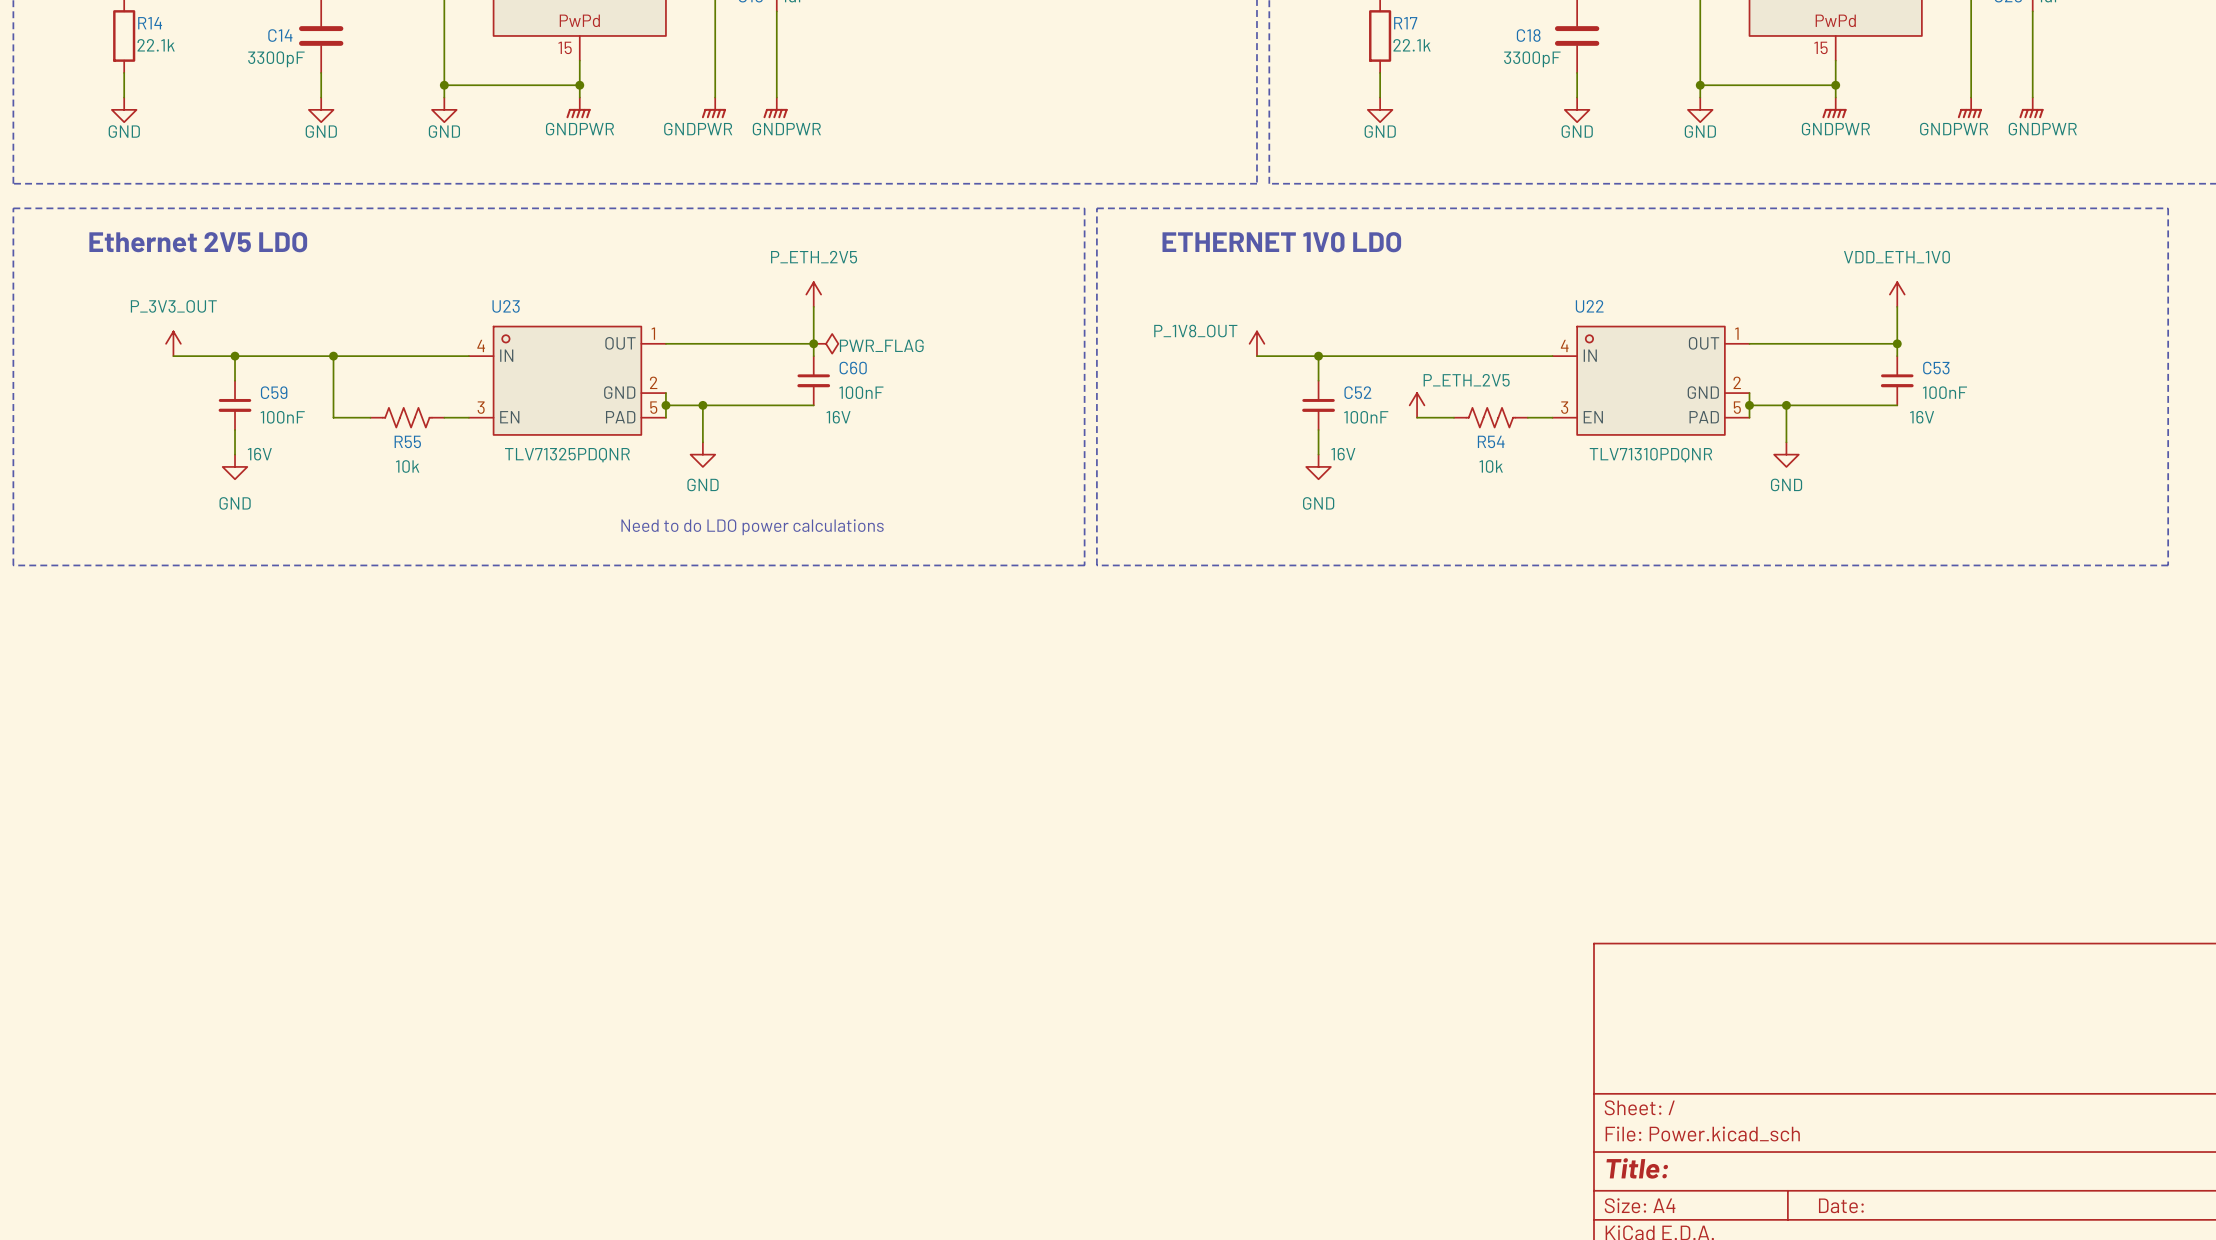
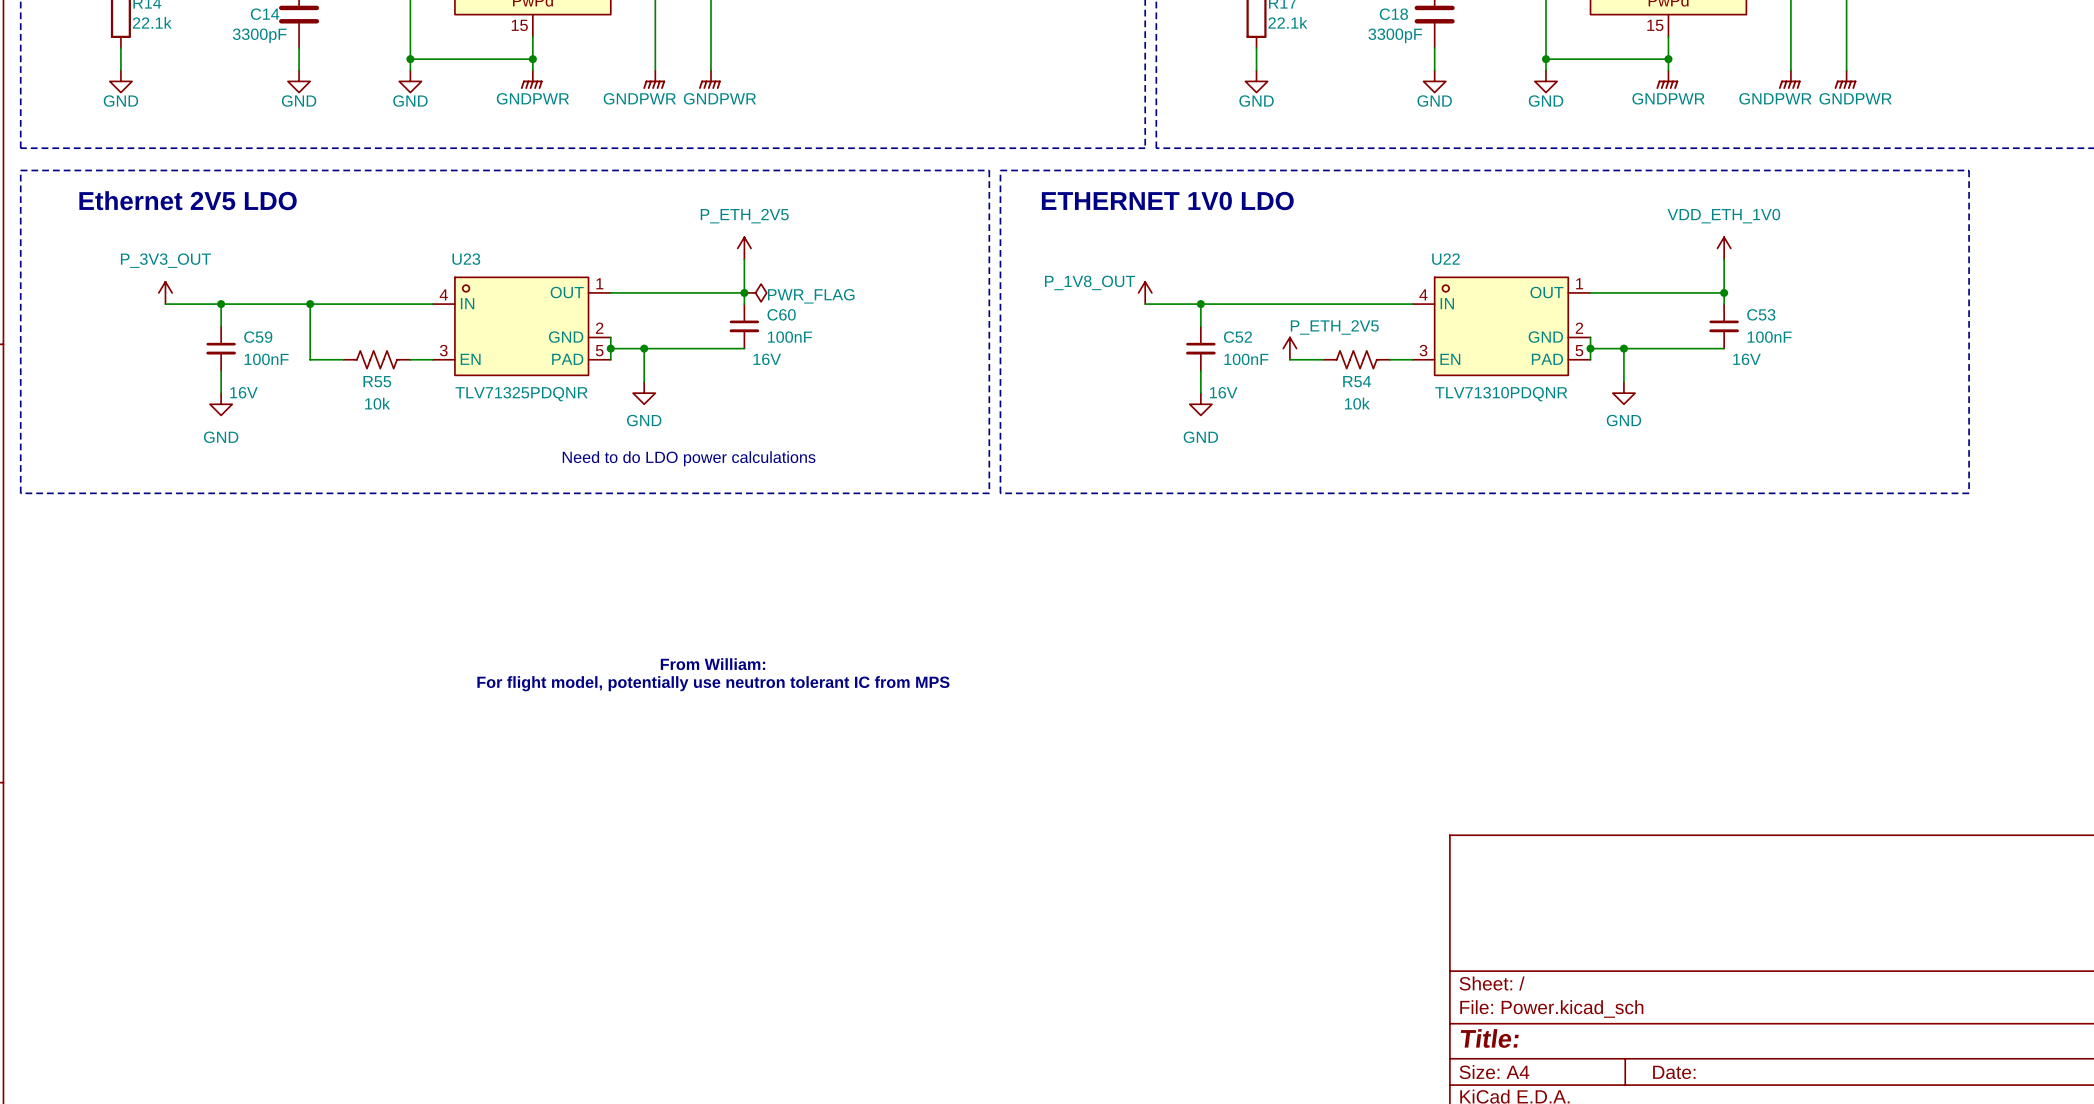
text: none -> From William: (712, 664)
text: none -> For flight model, potentially use neutron tolerant IC from MPS (713, 683)

